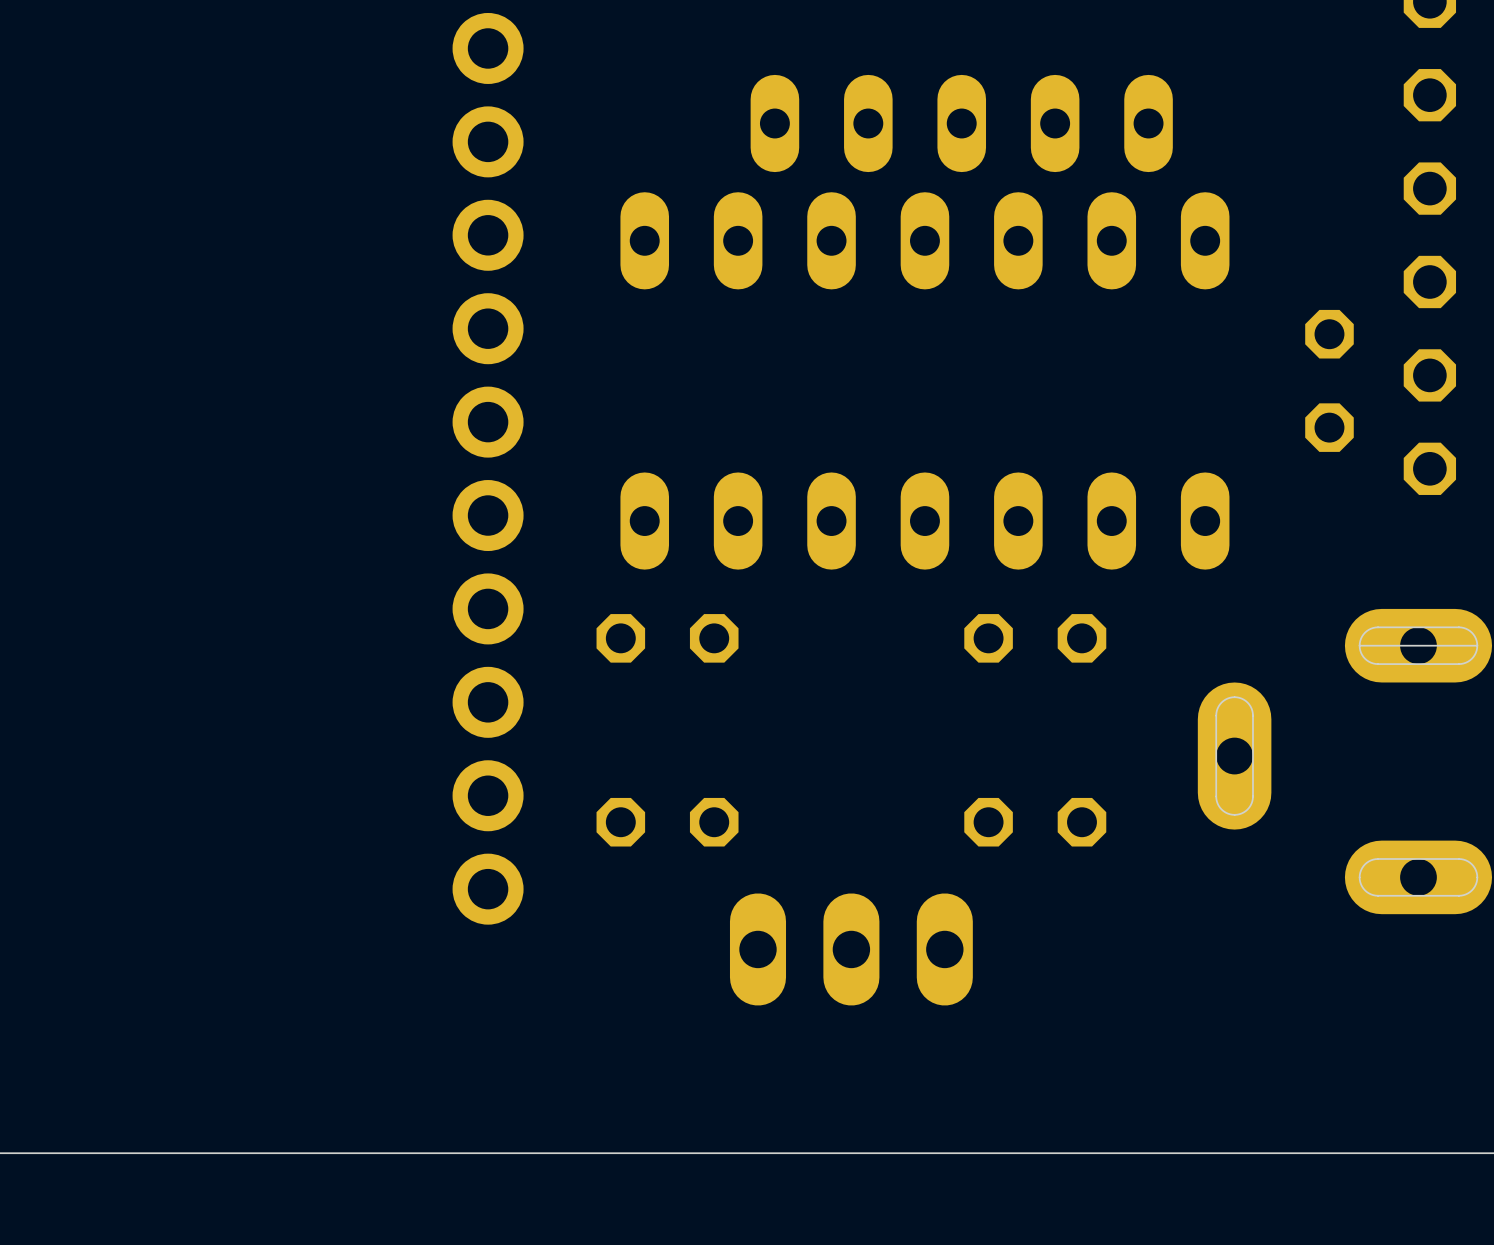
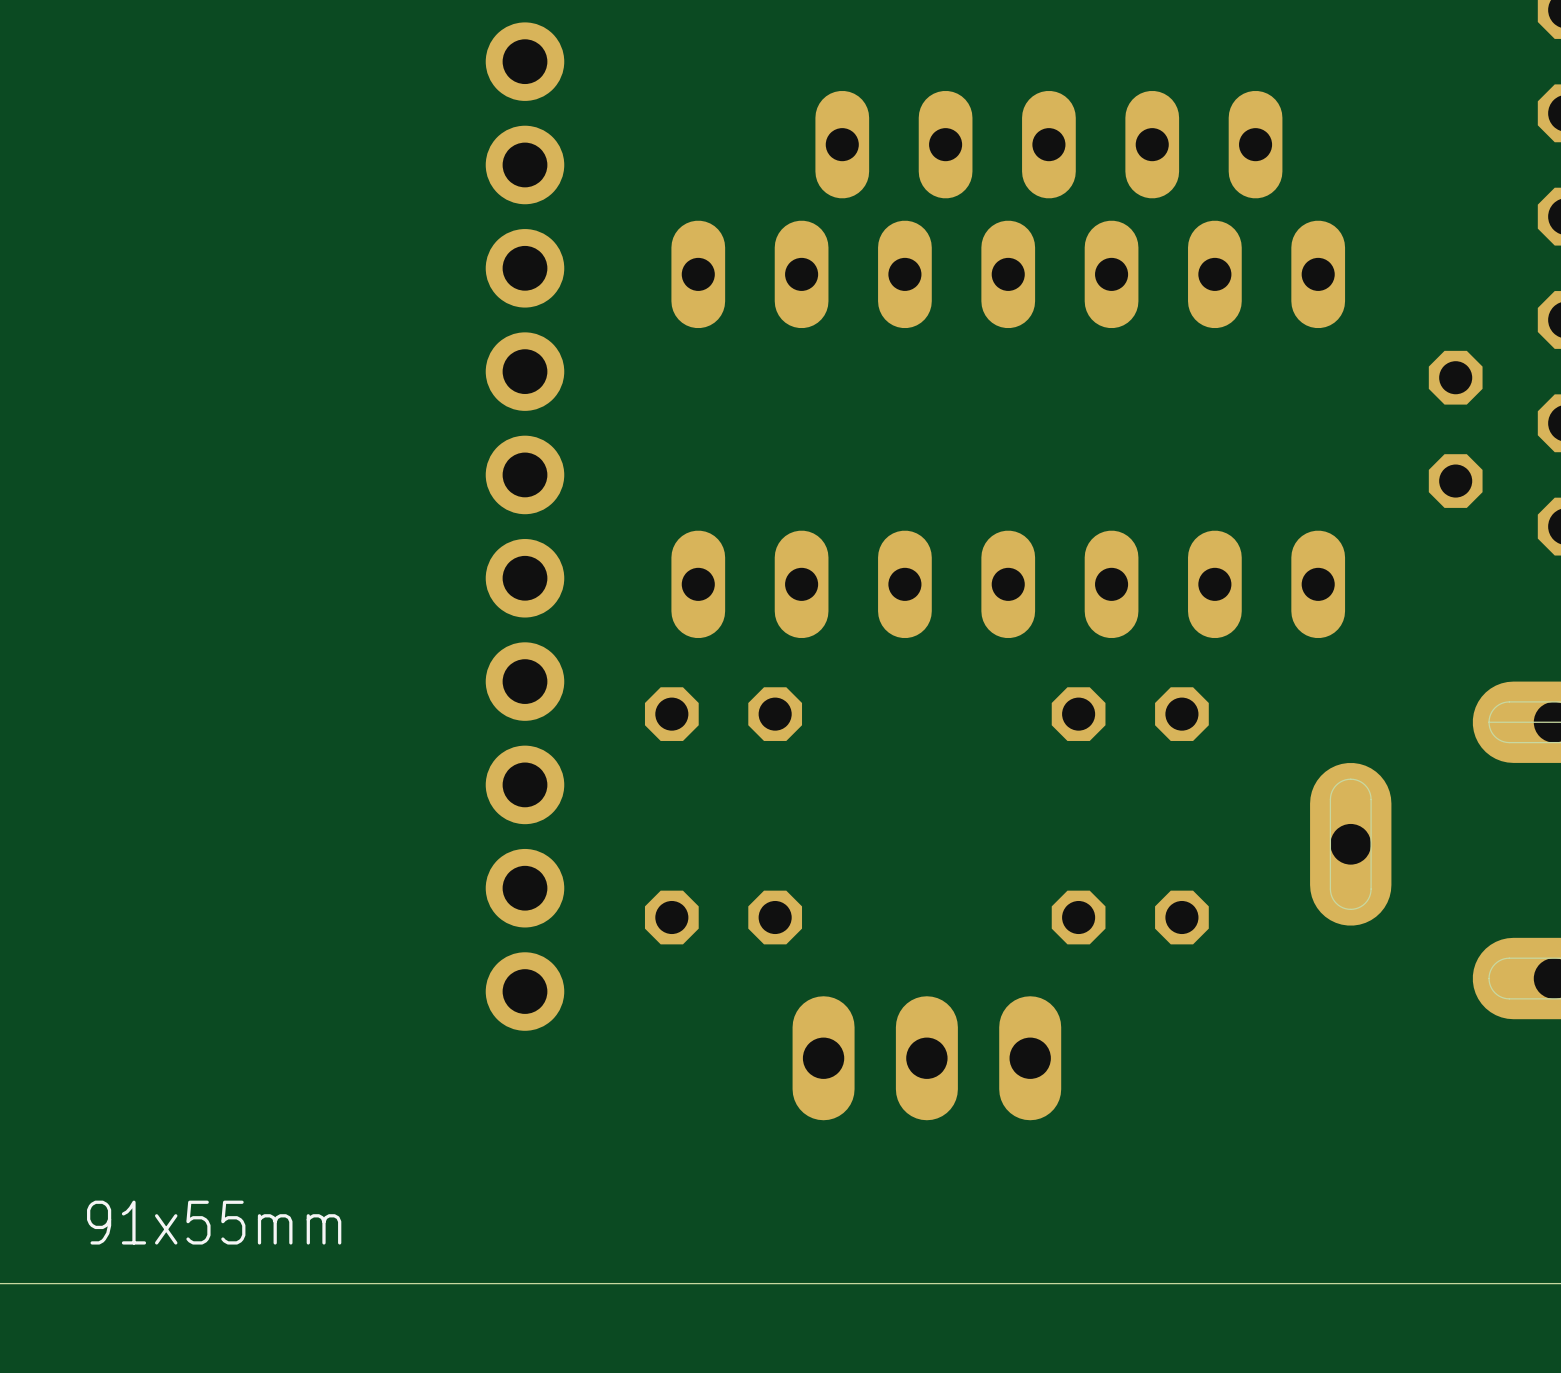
text: none -> 91x55mm (214, 1222)

